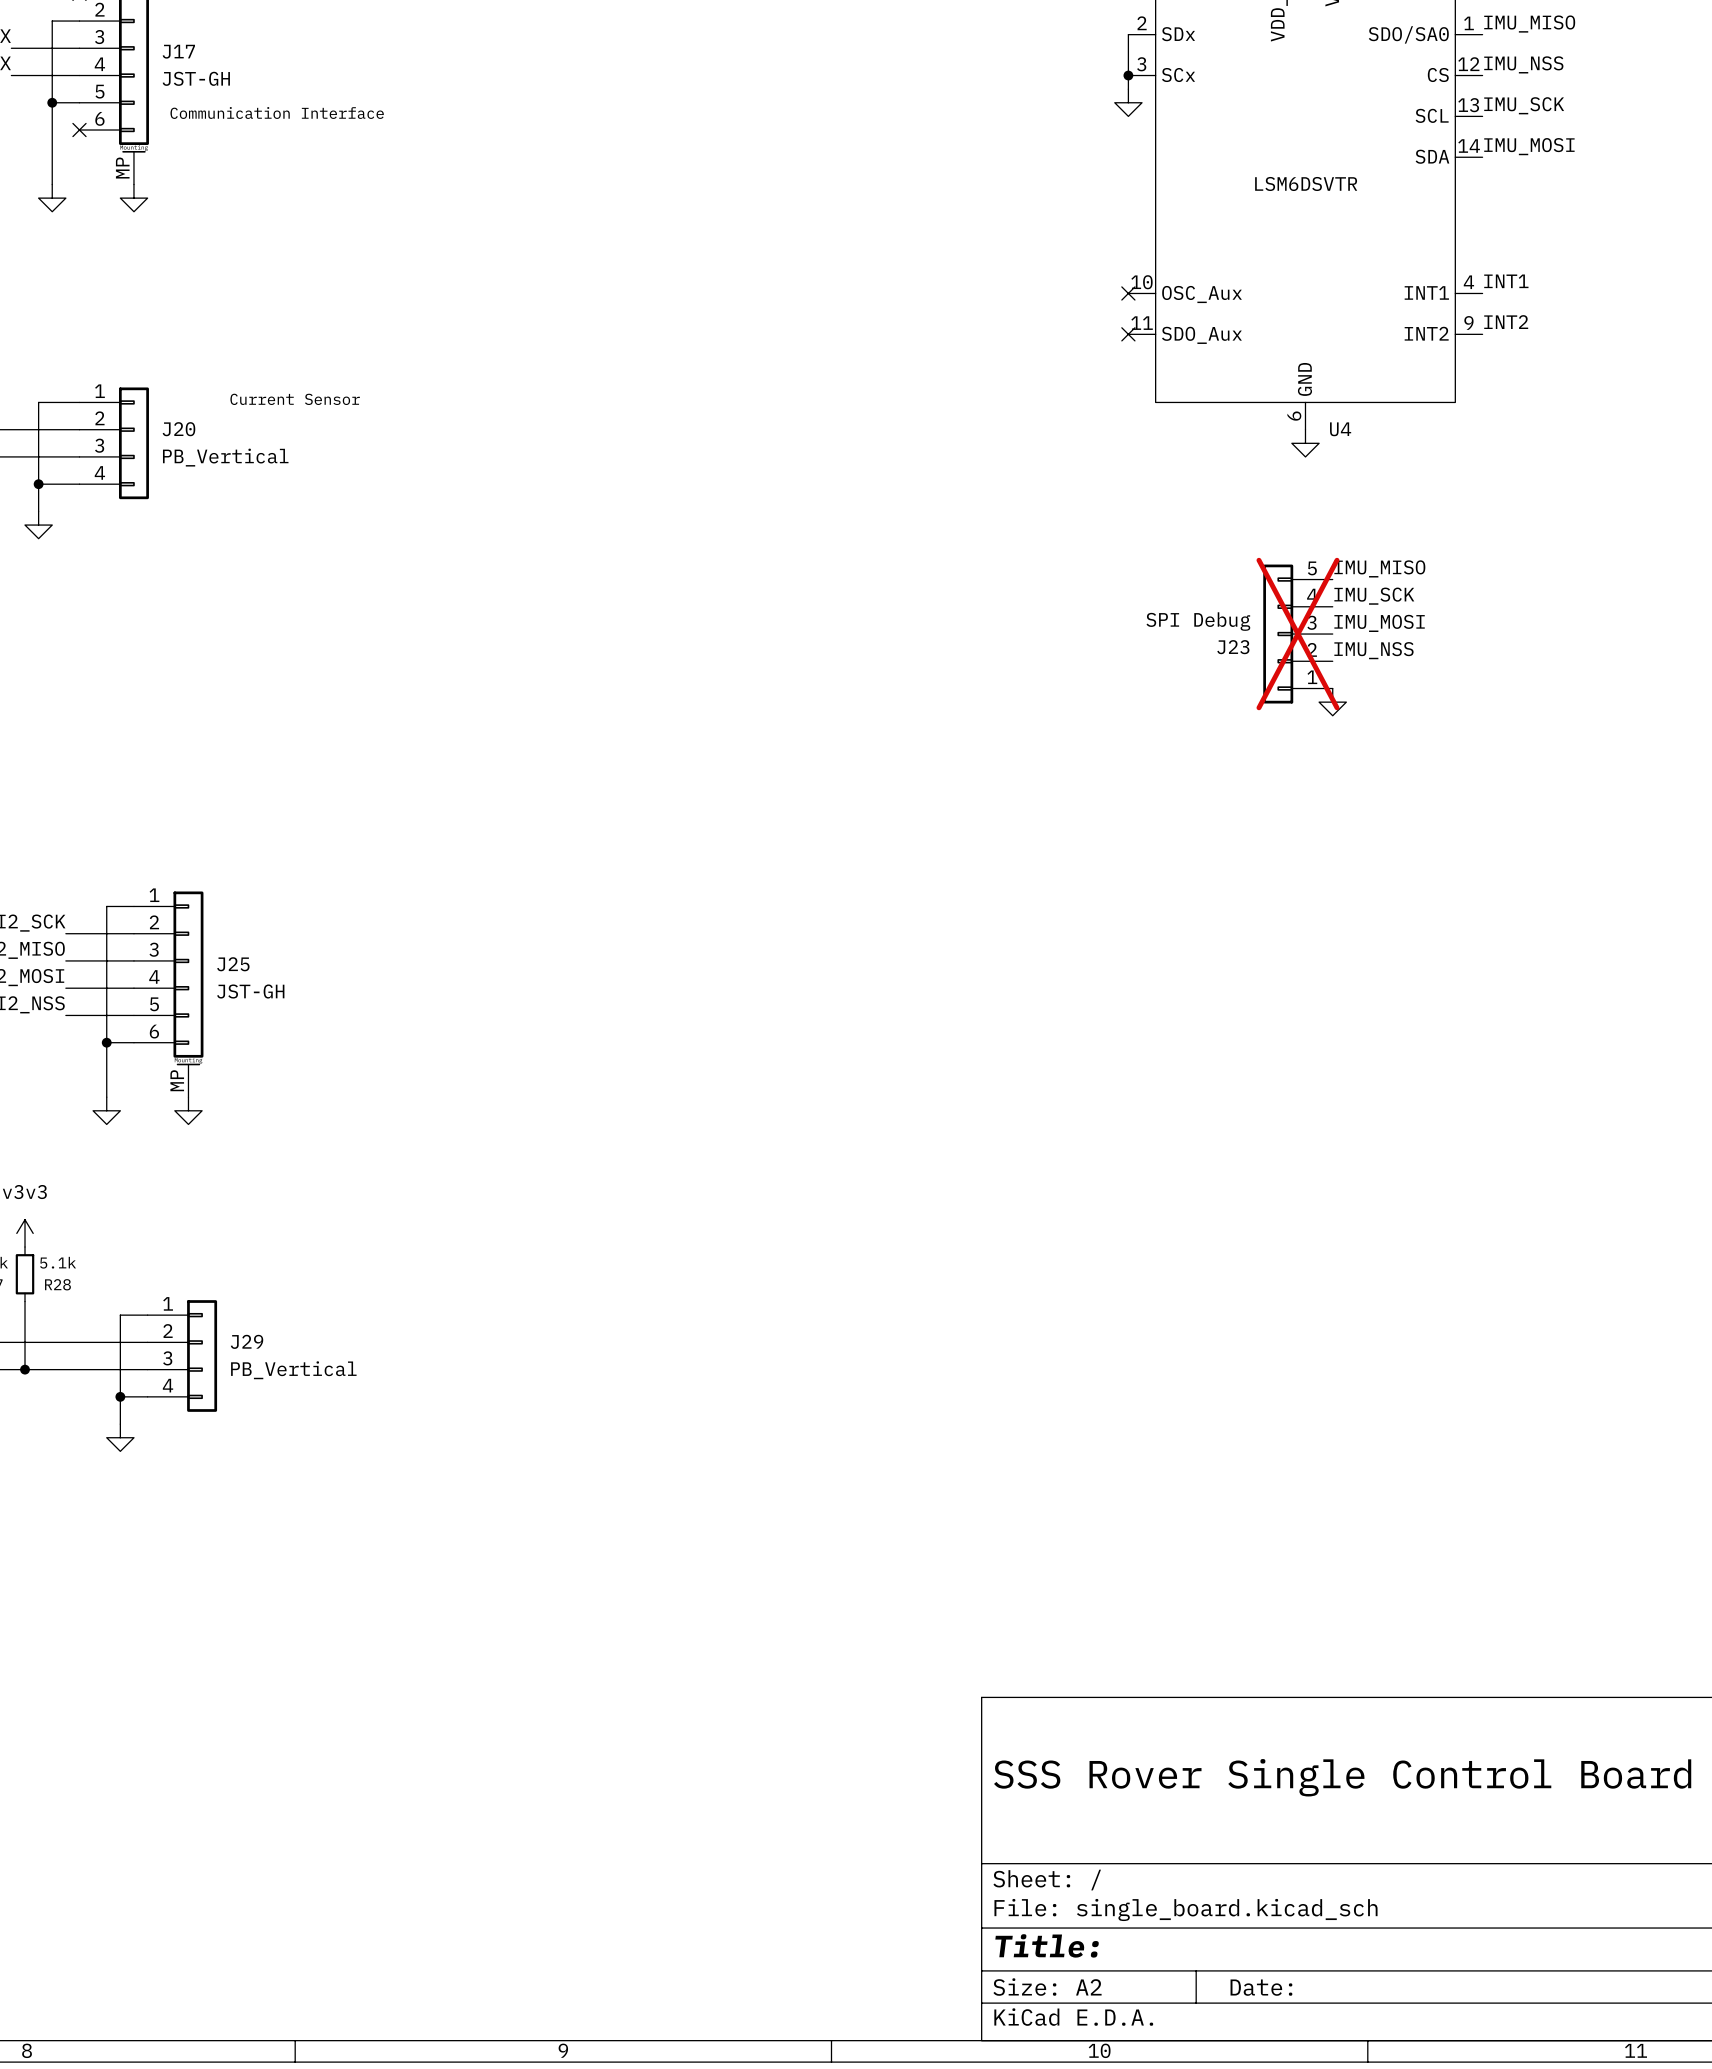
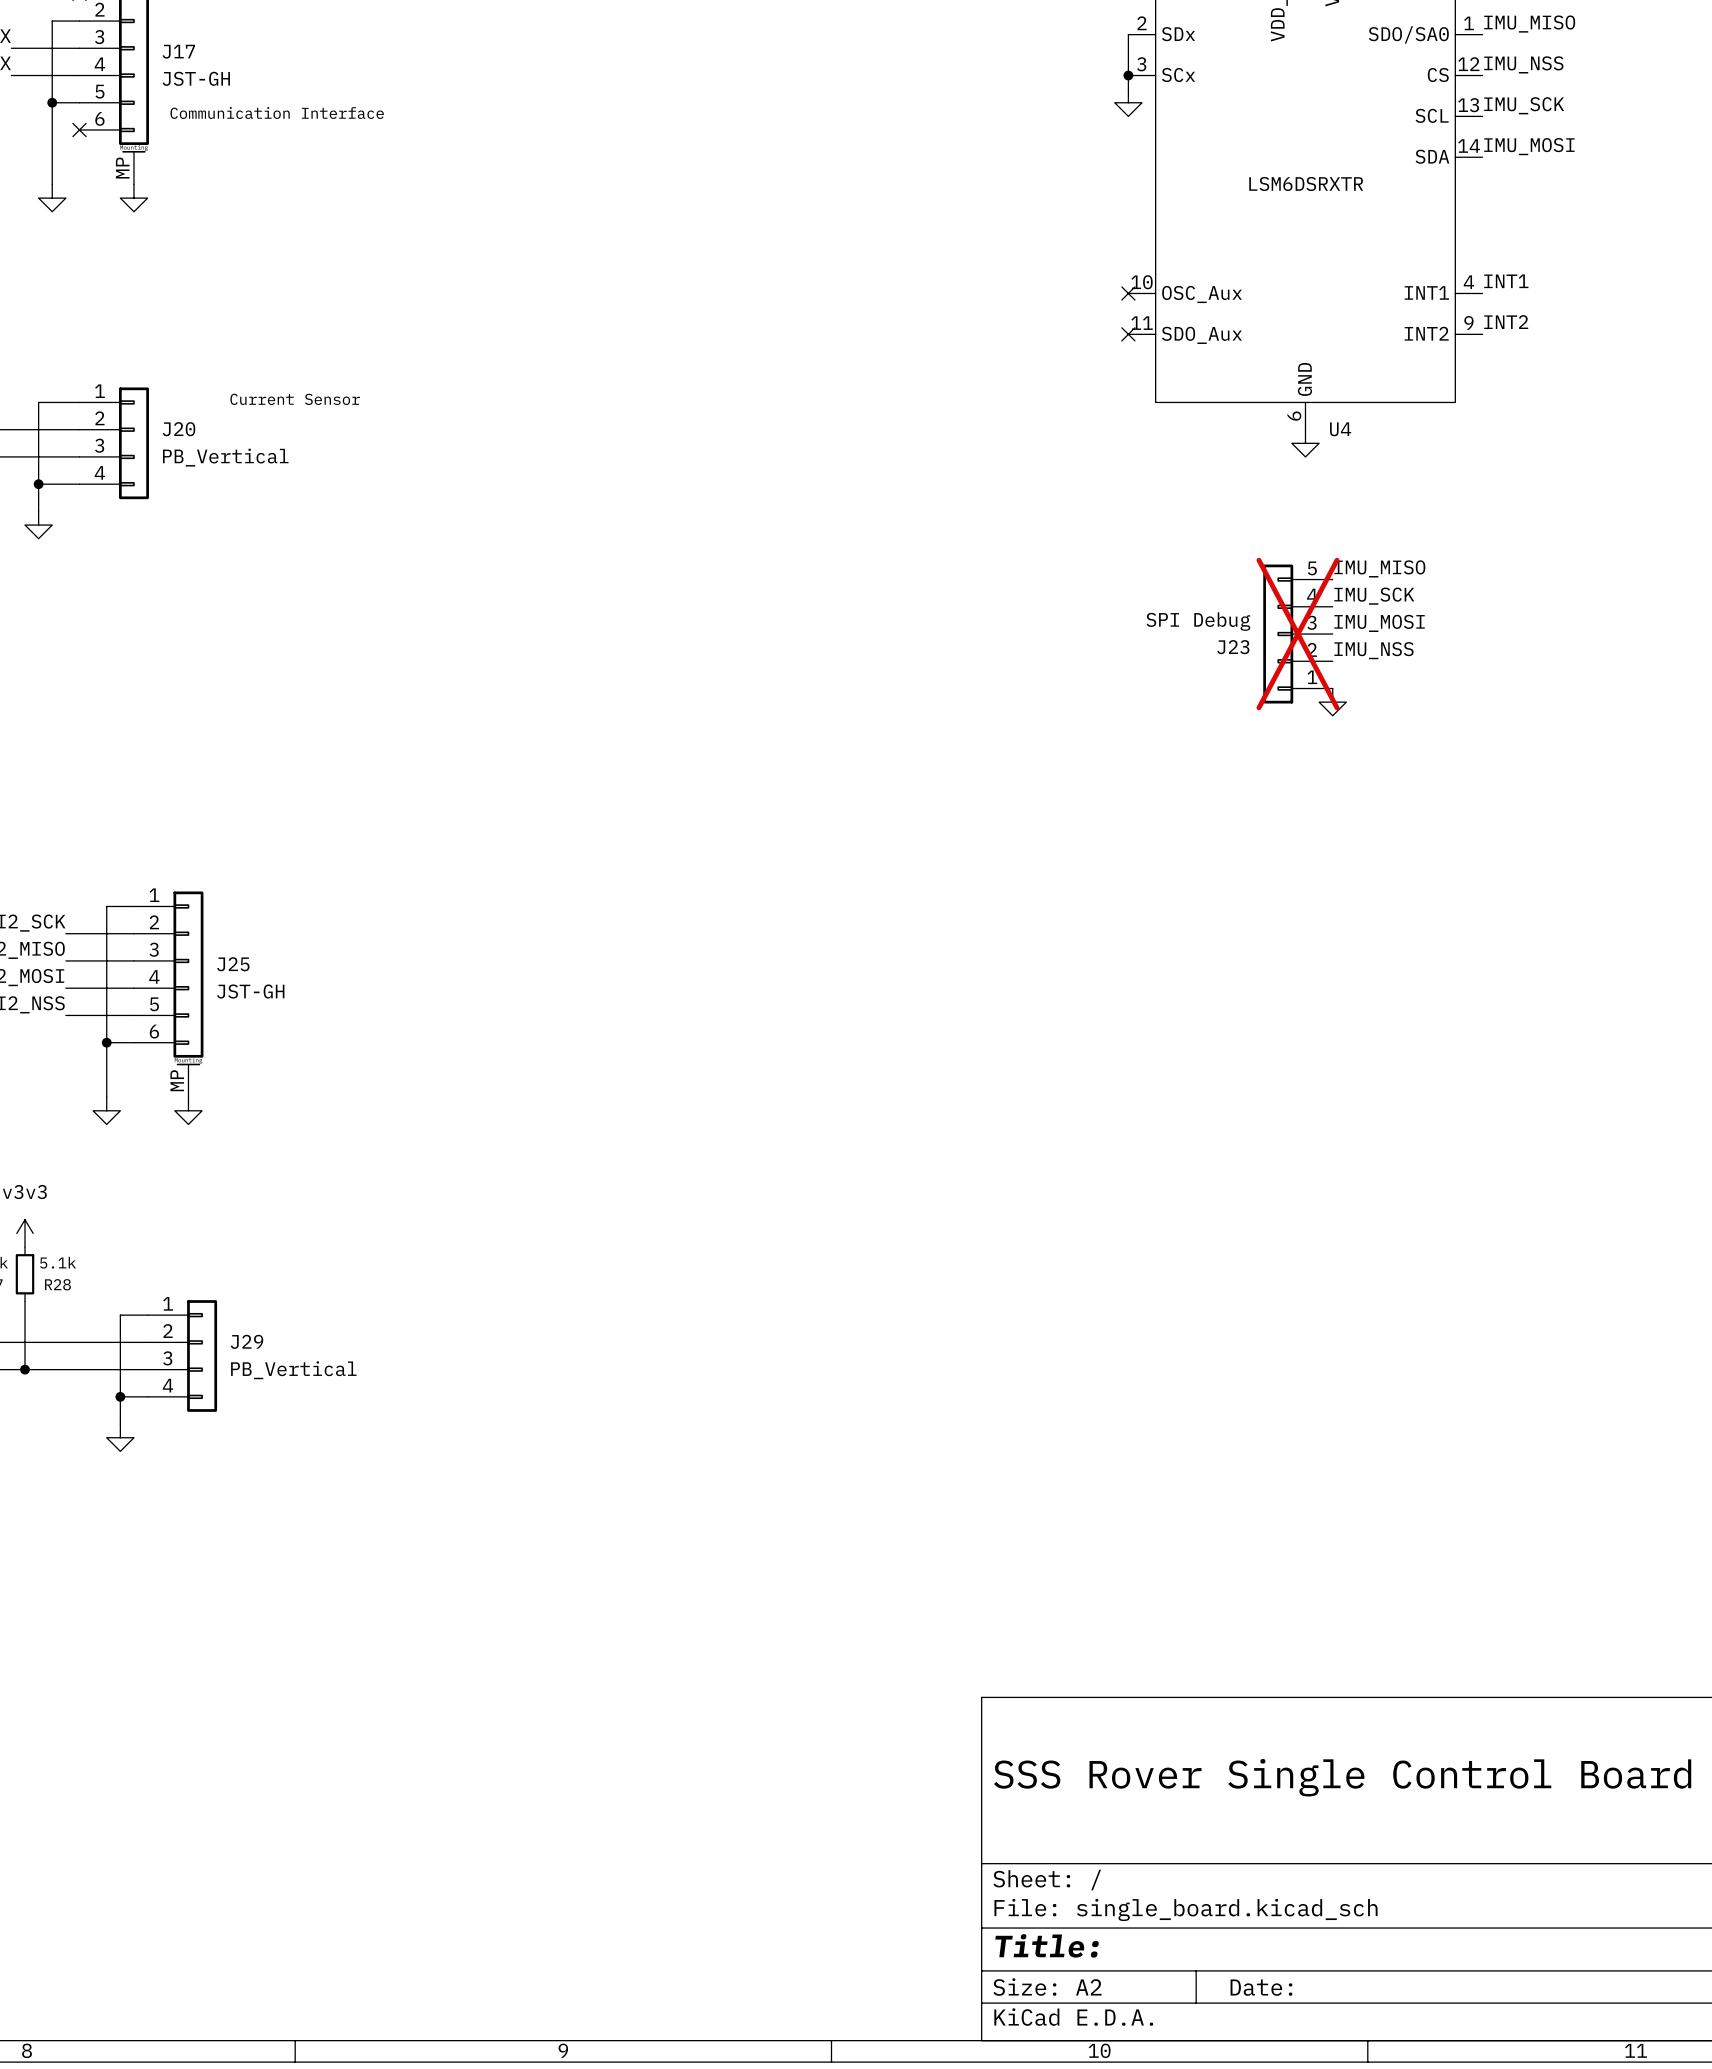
U4 value: LSM6DSVTR (1306, 183) -> LSM6DSRXTR (1306, 183)

